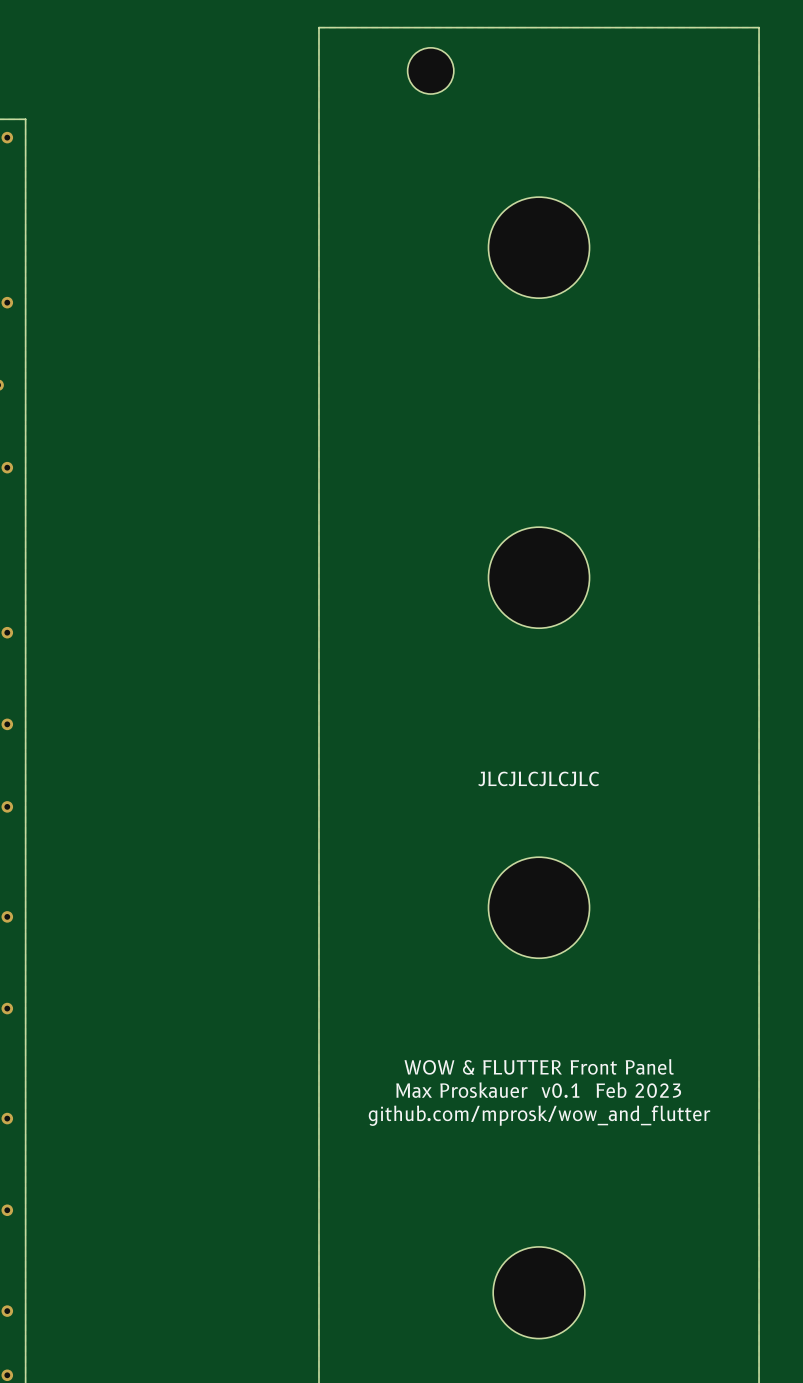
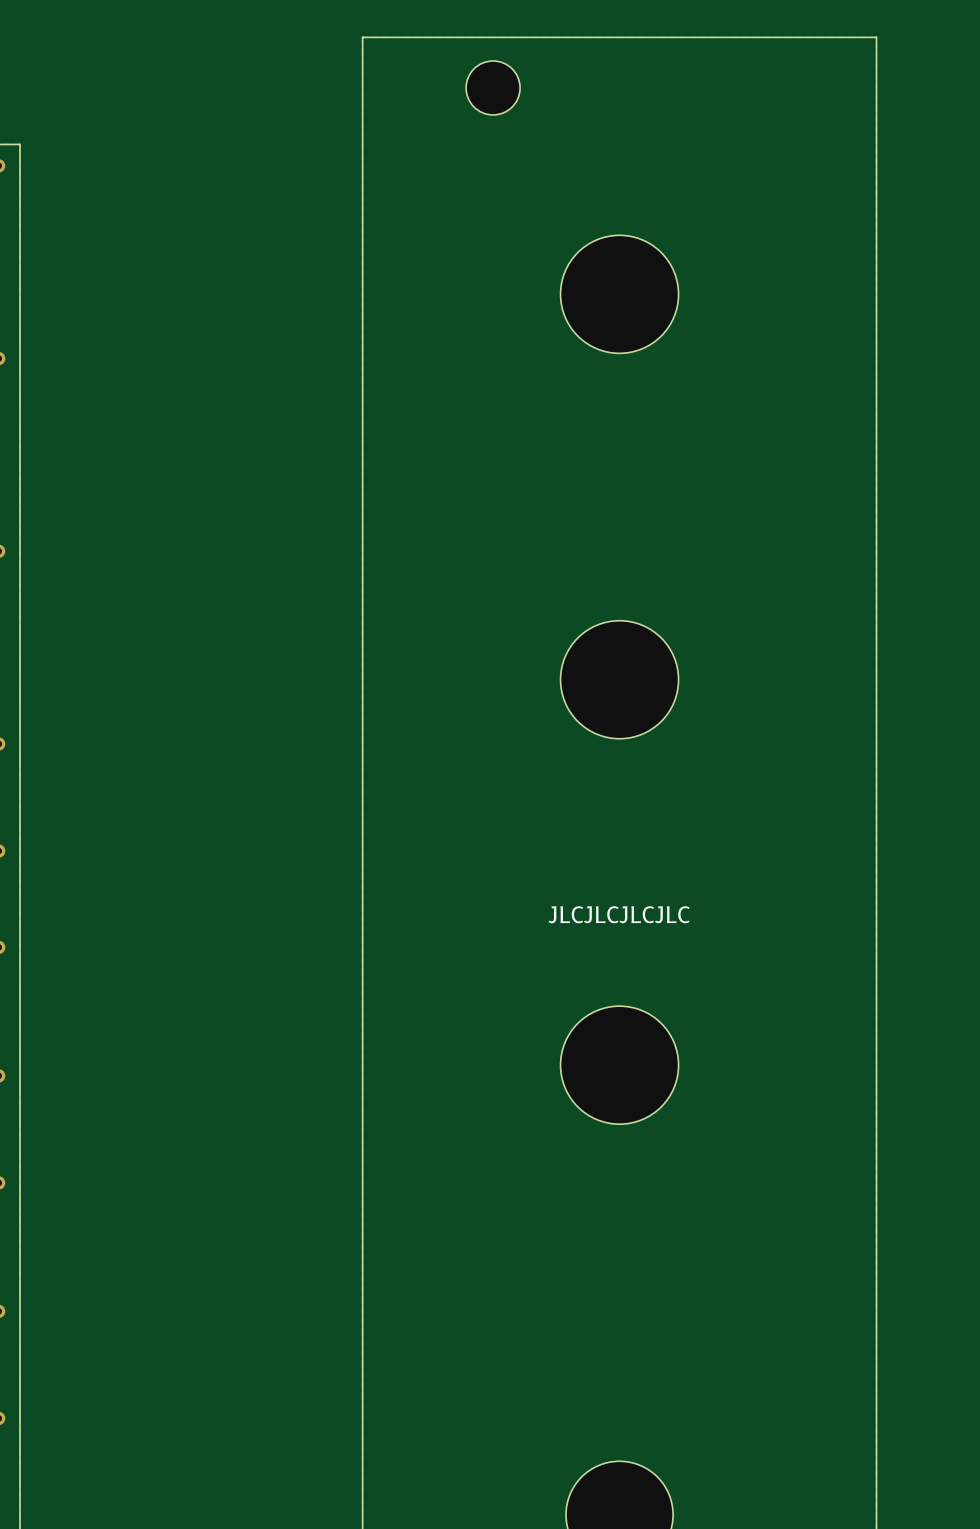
text: WOW & FLUTTER Front Panel (539, 1066) -> none
text: Max Proskauer v0.1 Feb 2023 (538, 1090) -> none
text: github.com/mprosk/wow_and_flutter (539, 1115) -> none

